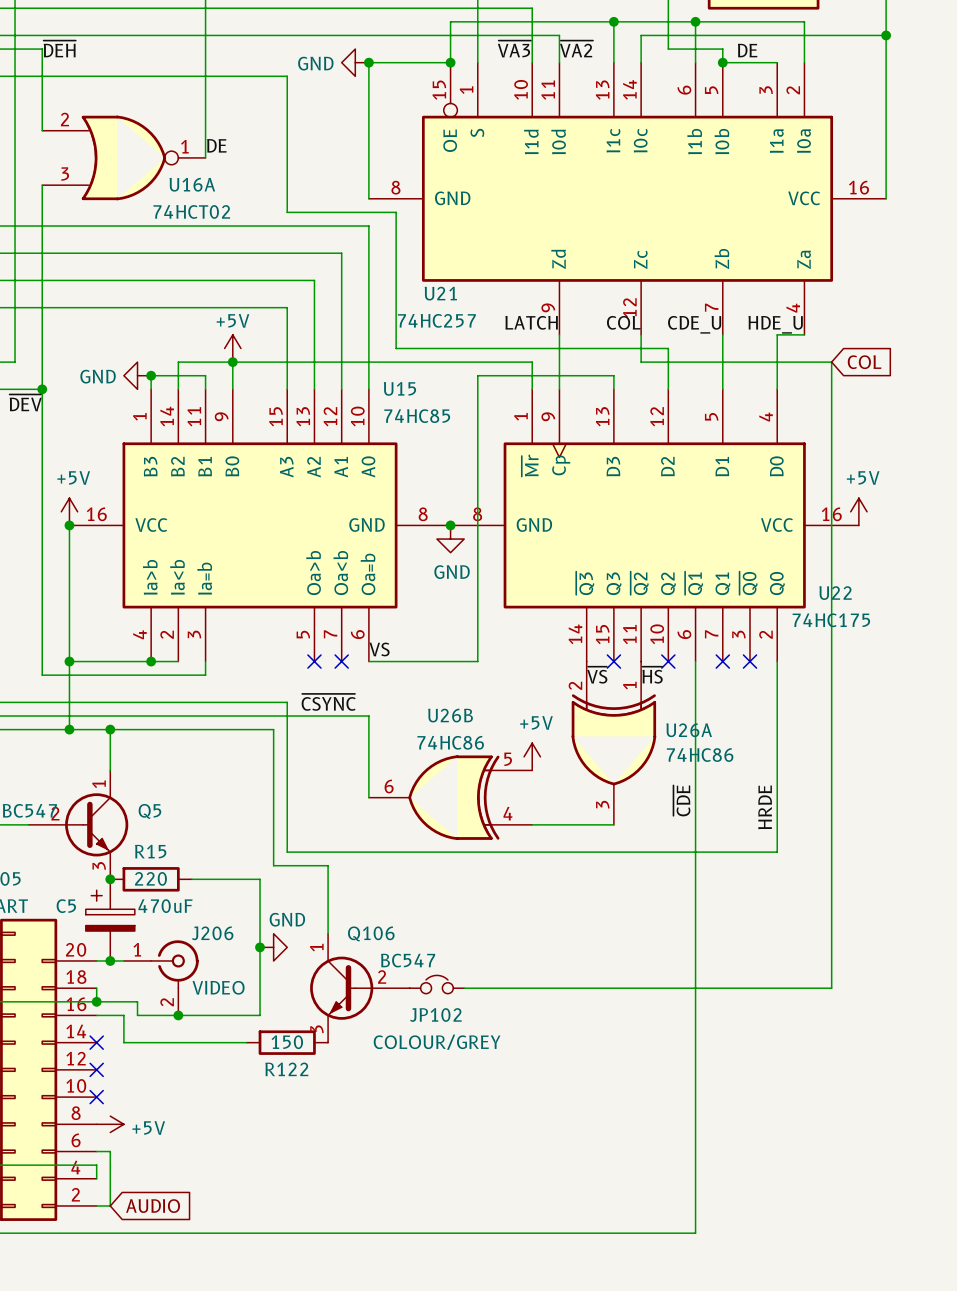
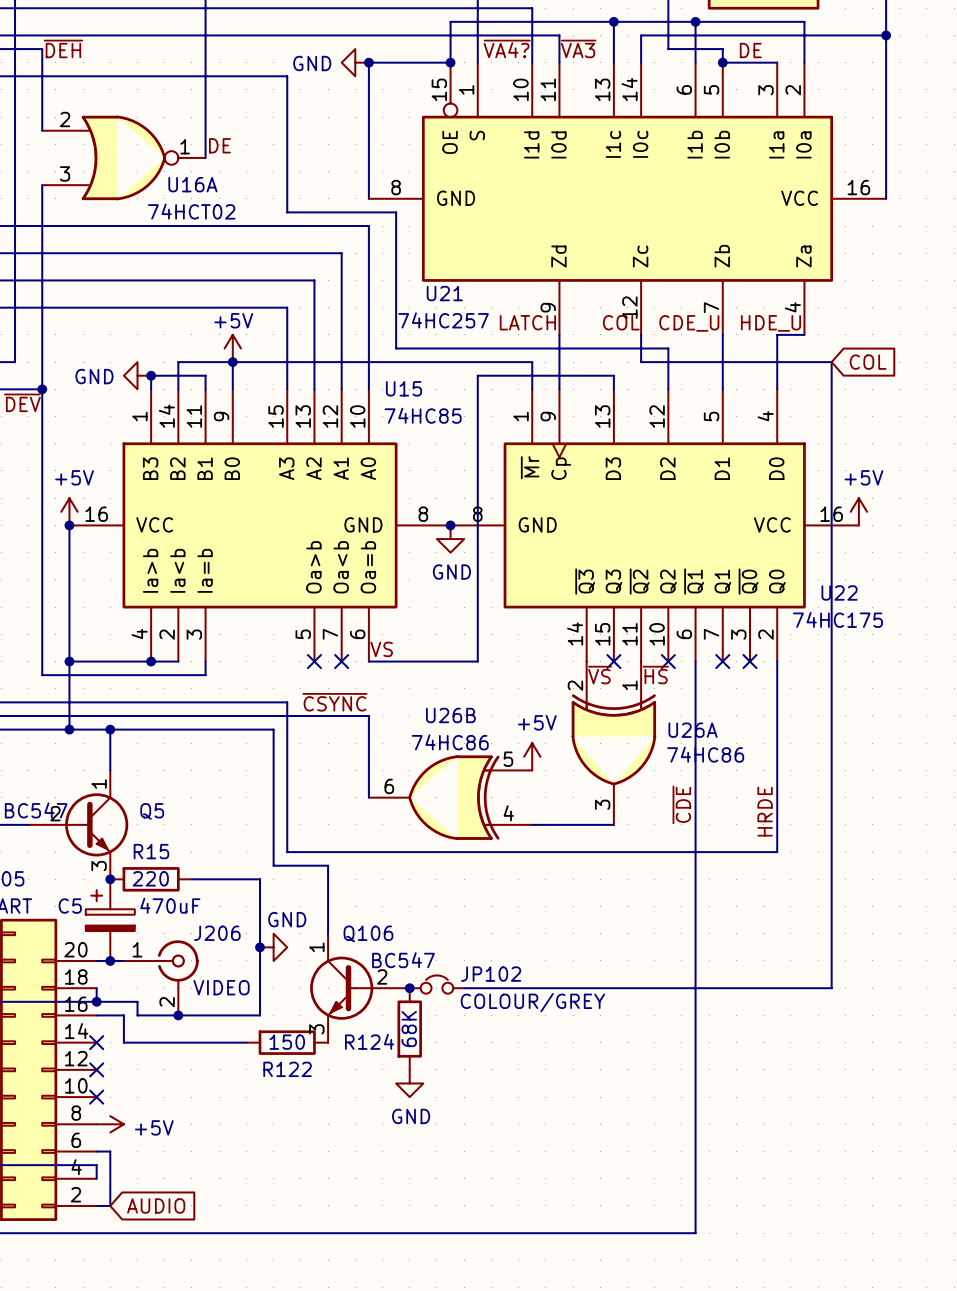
label: ~{VA3} (514, 49) -> ~{VA4?} (507, 48)
label: ~{VA2} (576, 49) -> ~{VA3} (578, 48)
junction: none -> (409, 988)
JP102 name position: JP102 (435, 1014) -> JP102 (491, 974)
R124: none -> 68K (409, 1029)
JP102 value position: COLOUR/GREY (437, 1042) -> COLOUR/GREY (532, 1002)
power symbol: none -> GND (409, 1083)

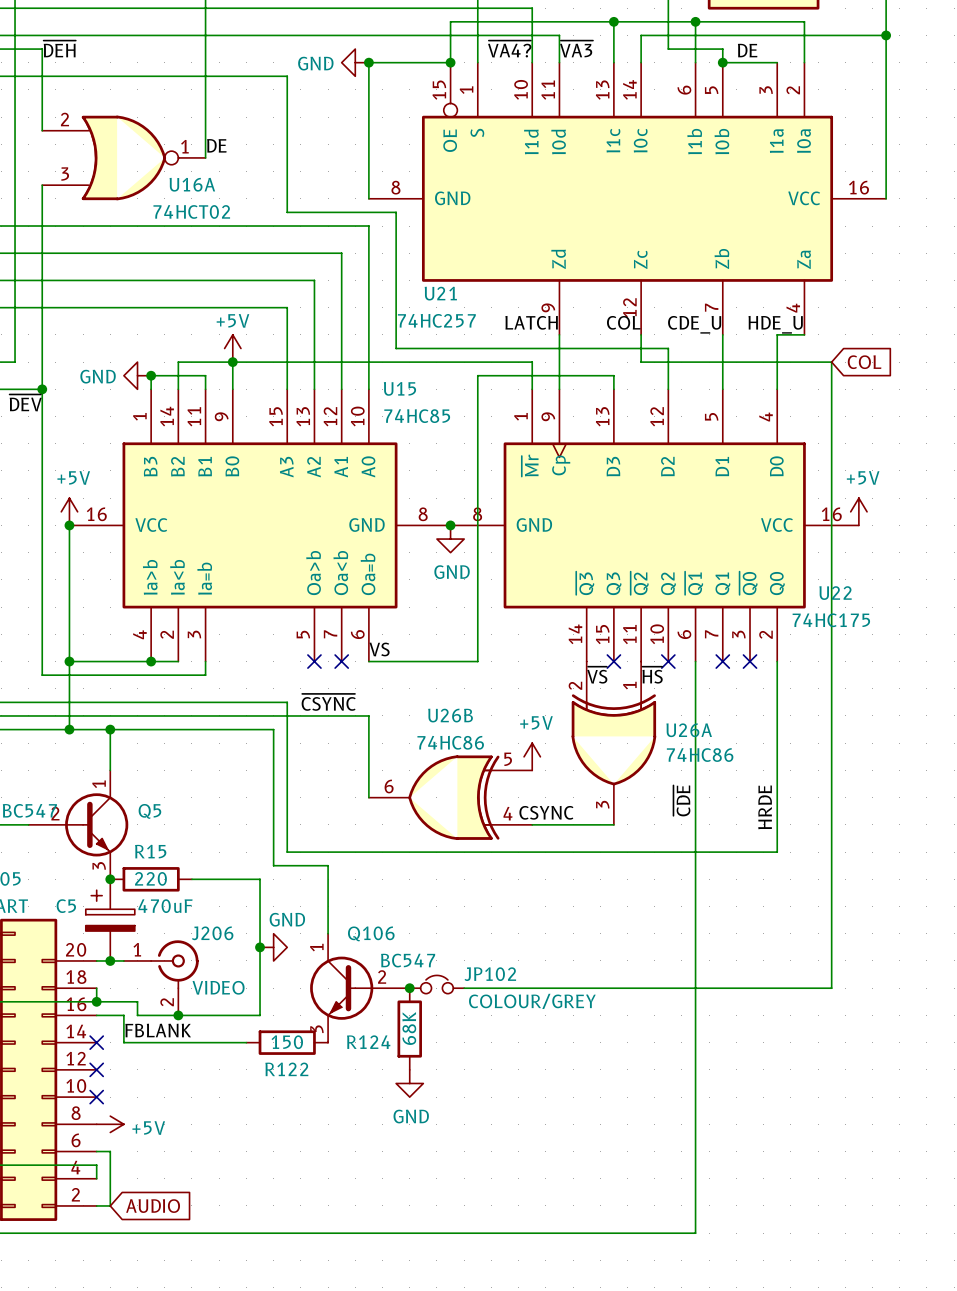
label: none -> CSYNC (546, 812)
label: none -> FBLANK (158, 1030)

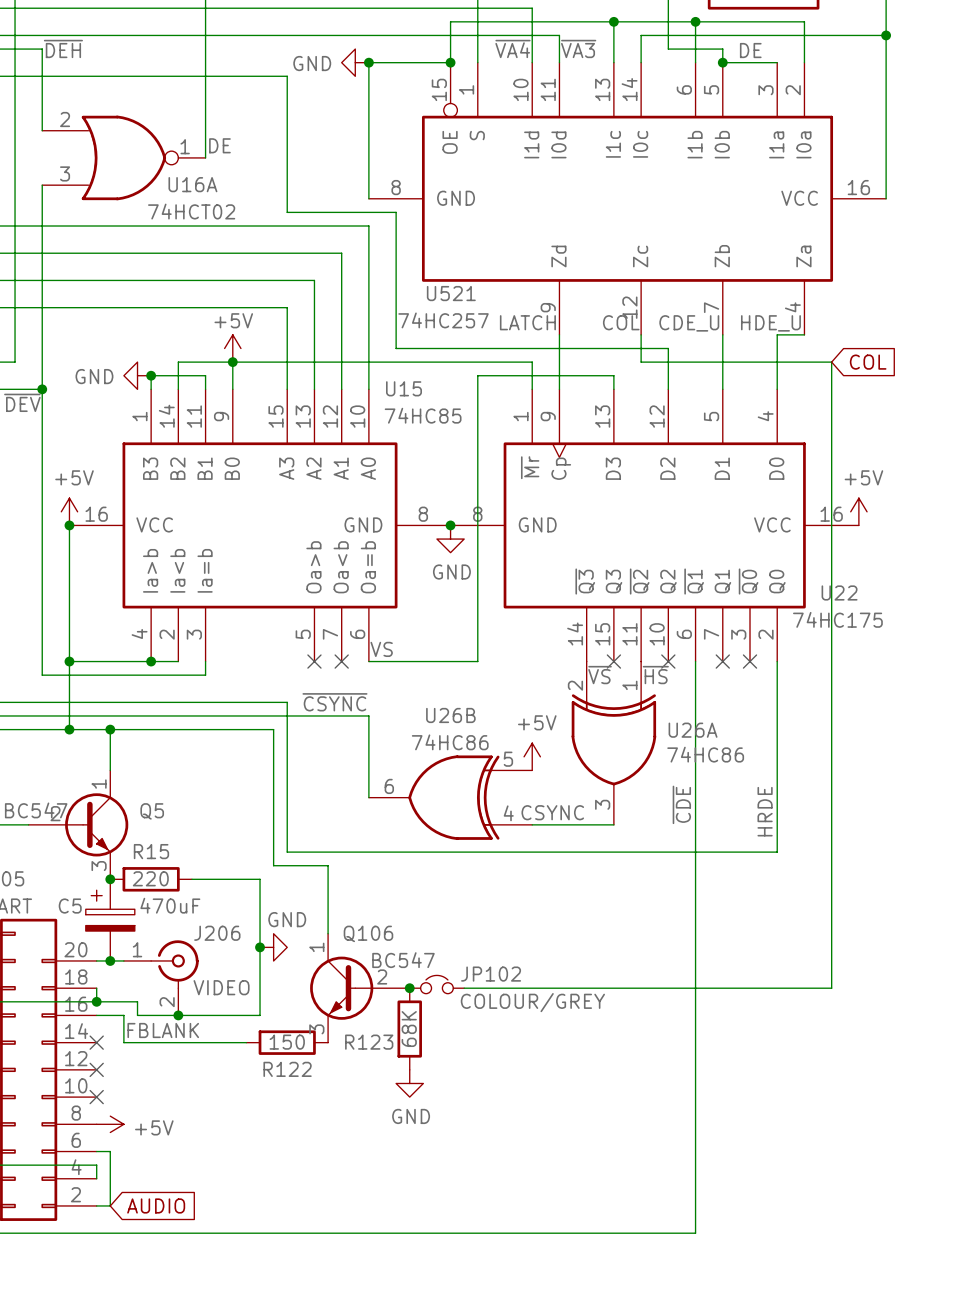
label: ~{VA4?} (509, 49) -> ~{VA4} (512, 48)
U21 name: U21 (440, 293) -> U521 (451, 293)
R124 name: R124 (368, 1042) -> R123 (369, 1042)

